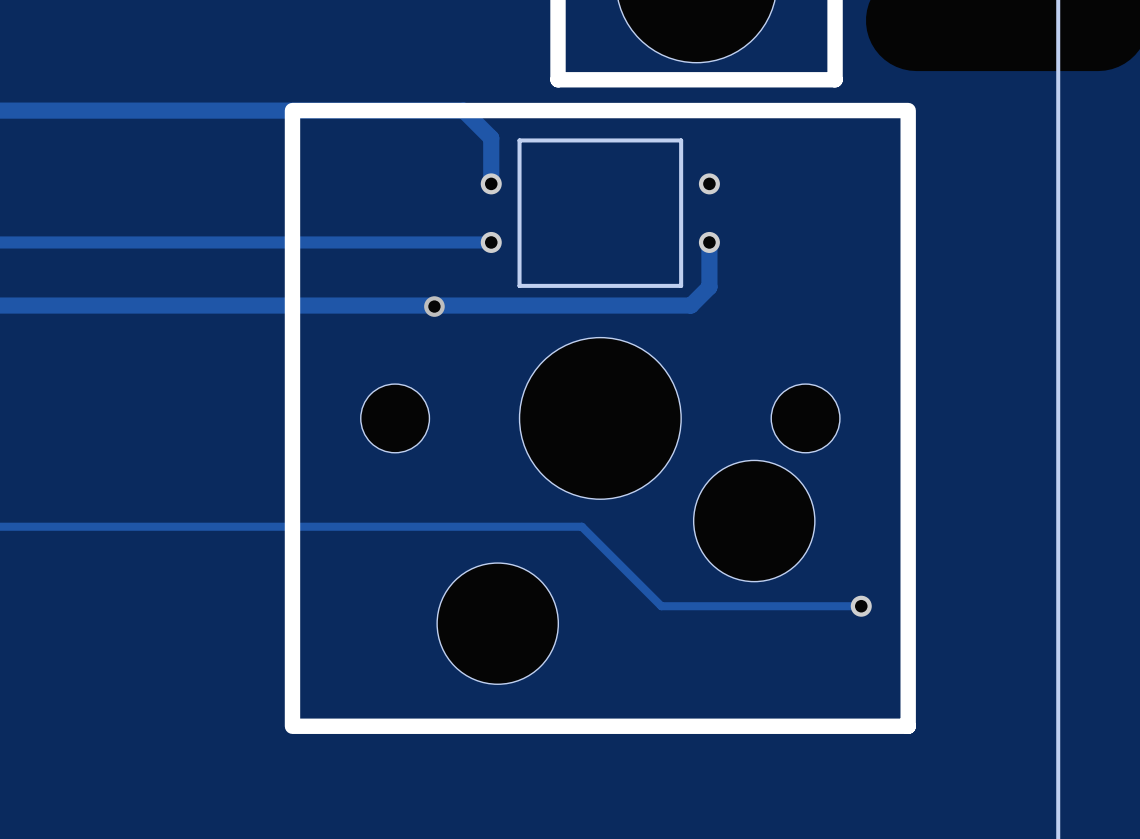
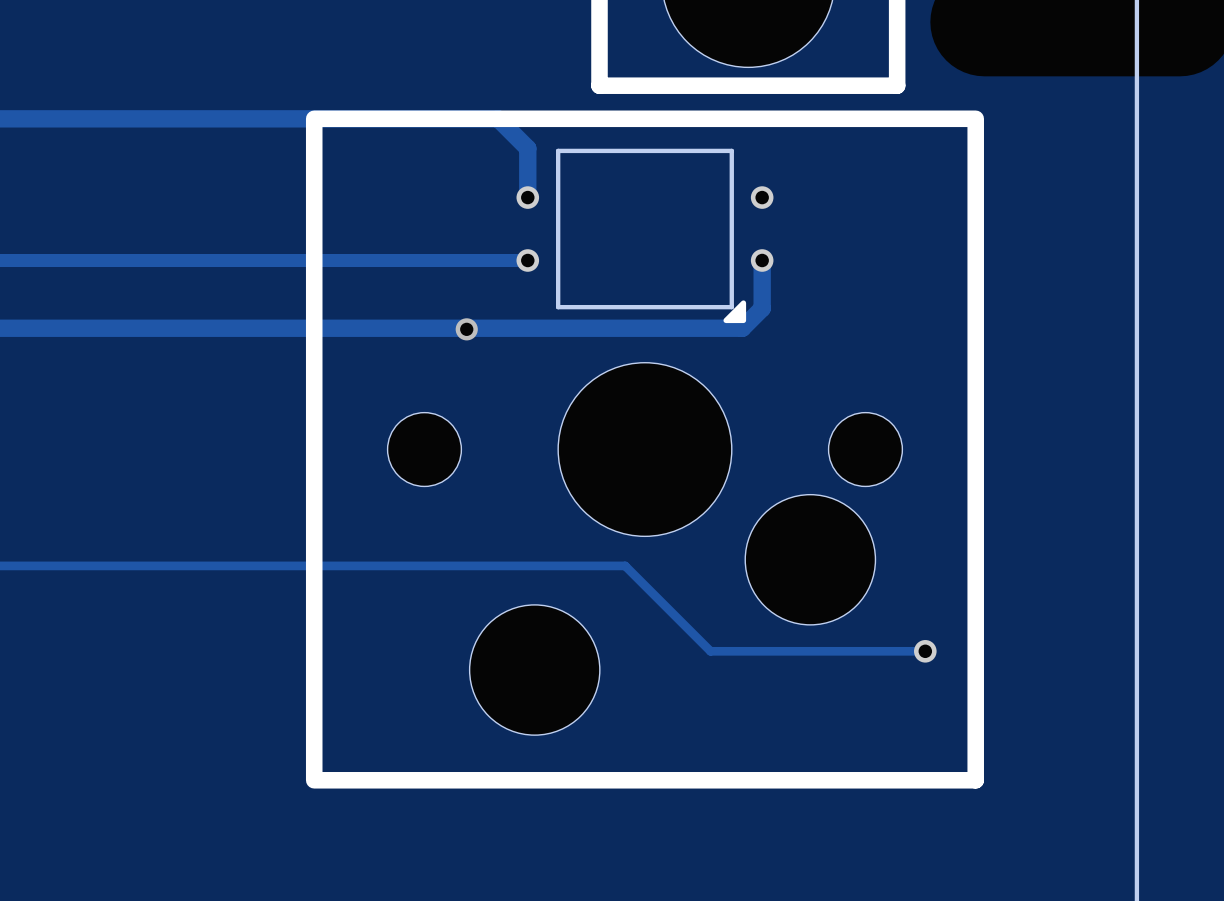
part footprint: [284, 102, 916, 734] -> [305, 110, 984, 789]

